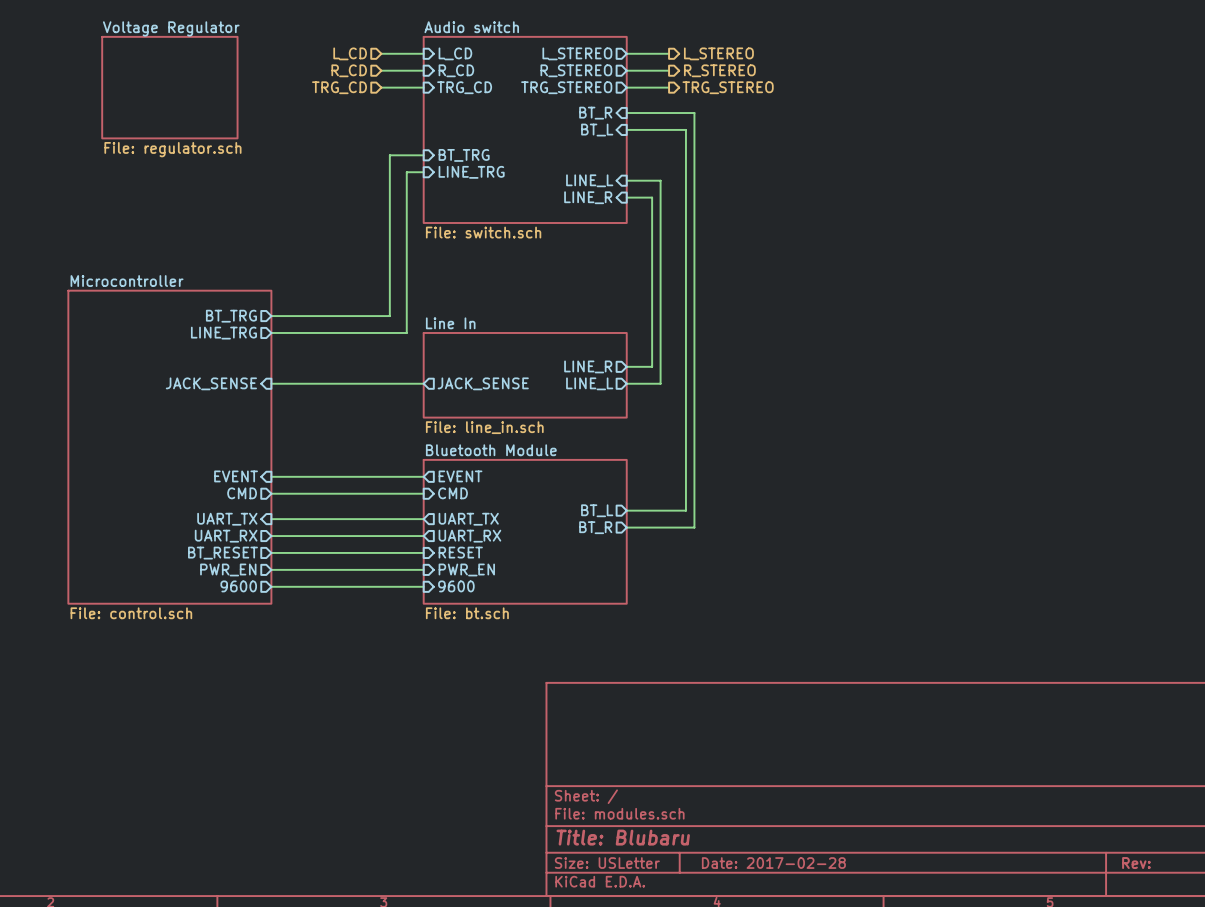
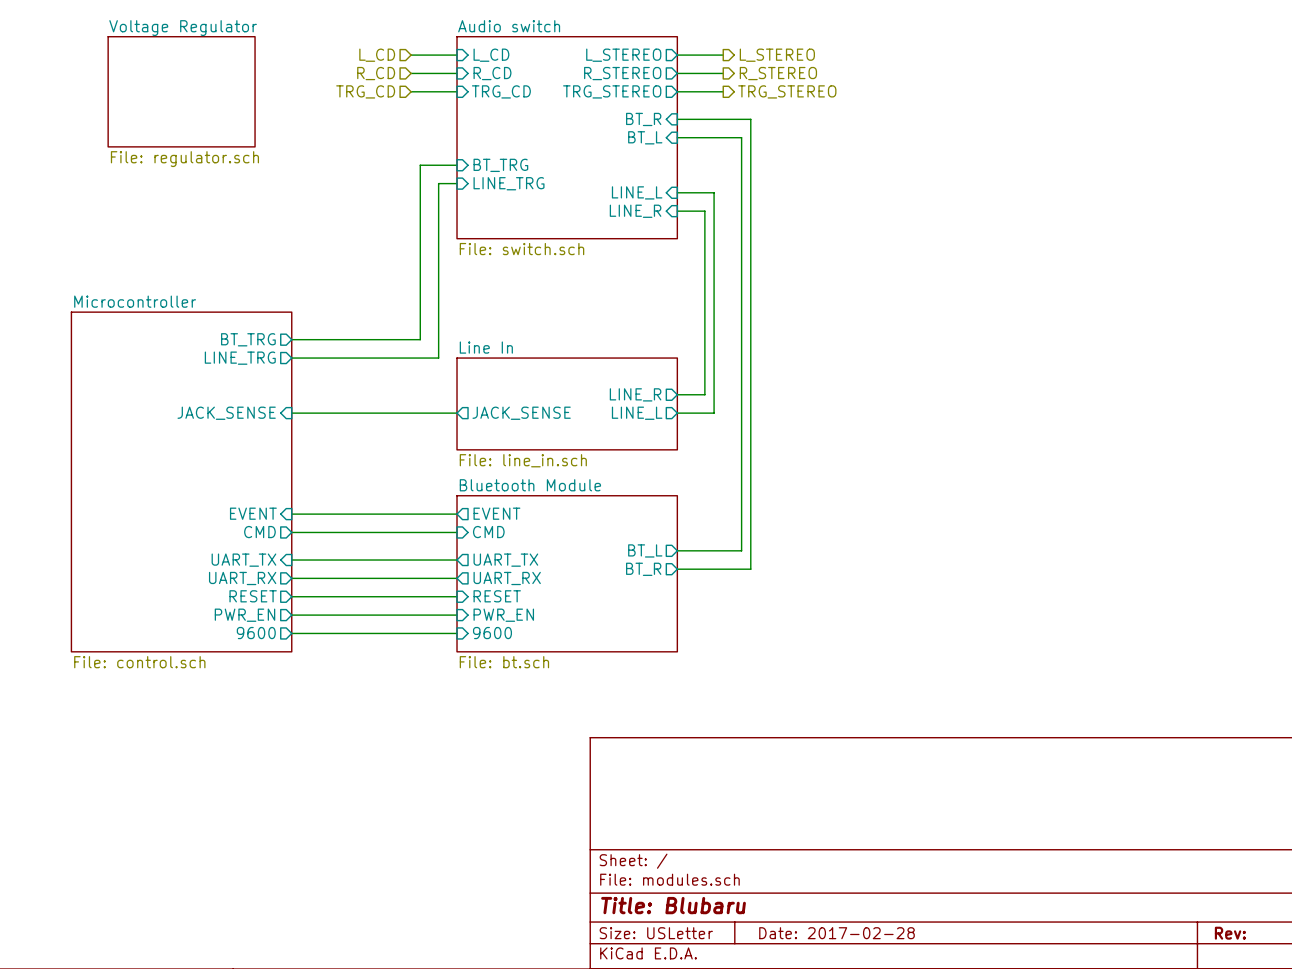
sheet pin: BT_RESET (222, 553) -> RESET (253, 596)

